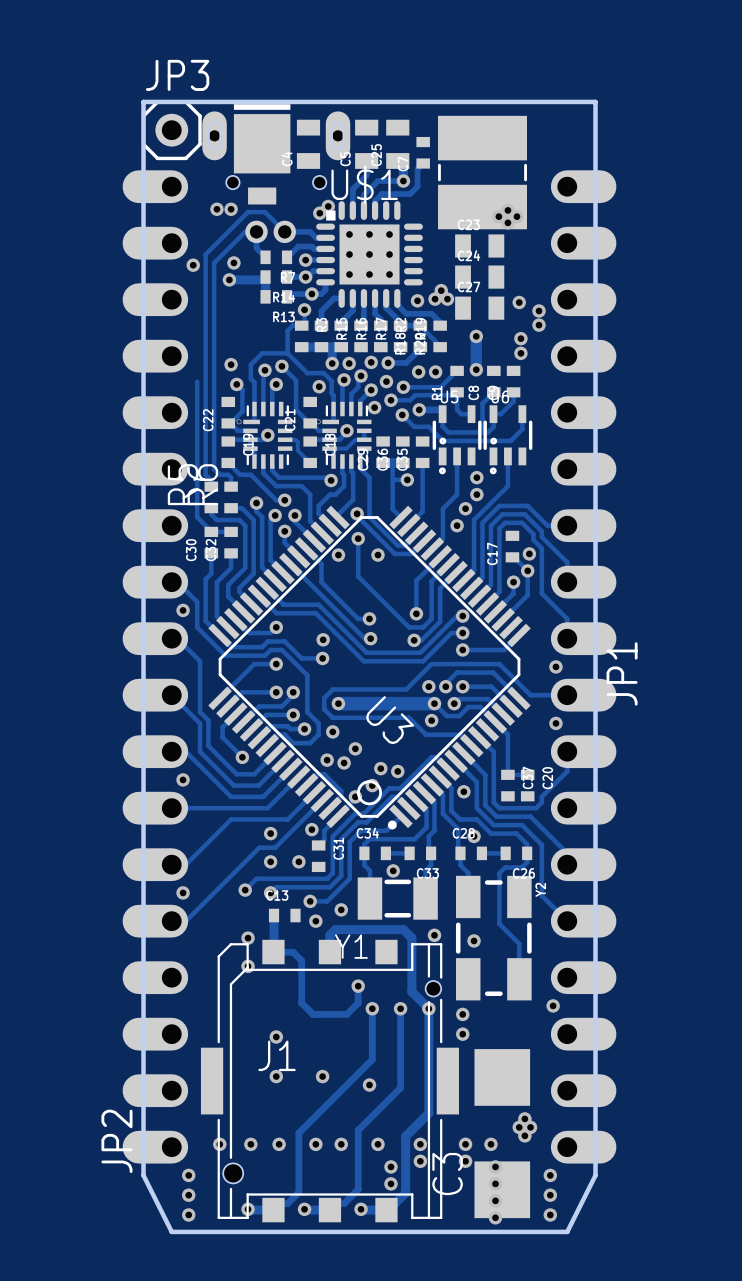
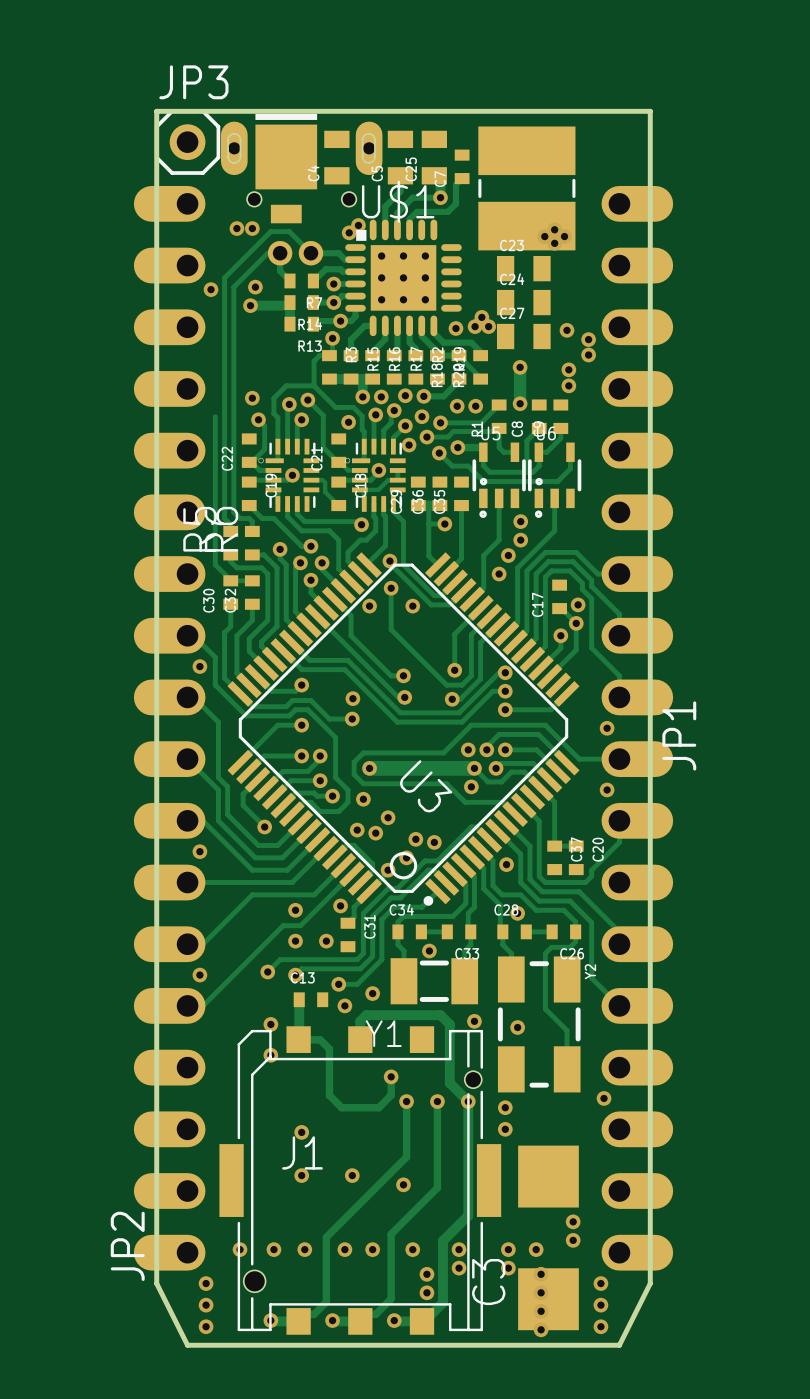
via: (519, 1127) -> none
via: (530, 1127) -> none

